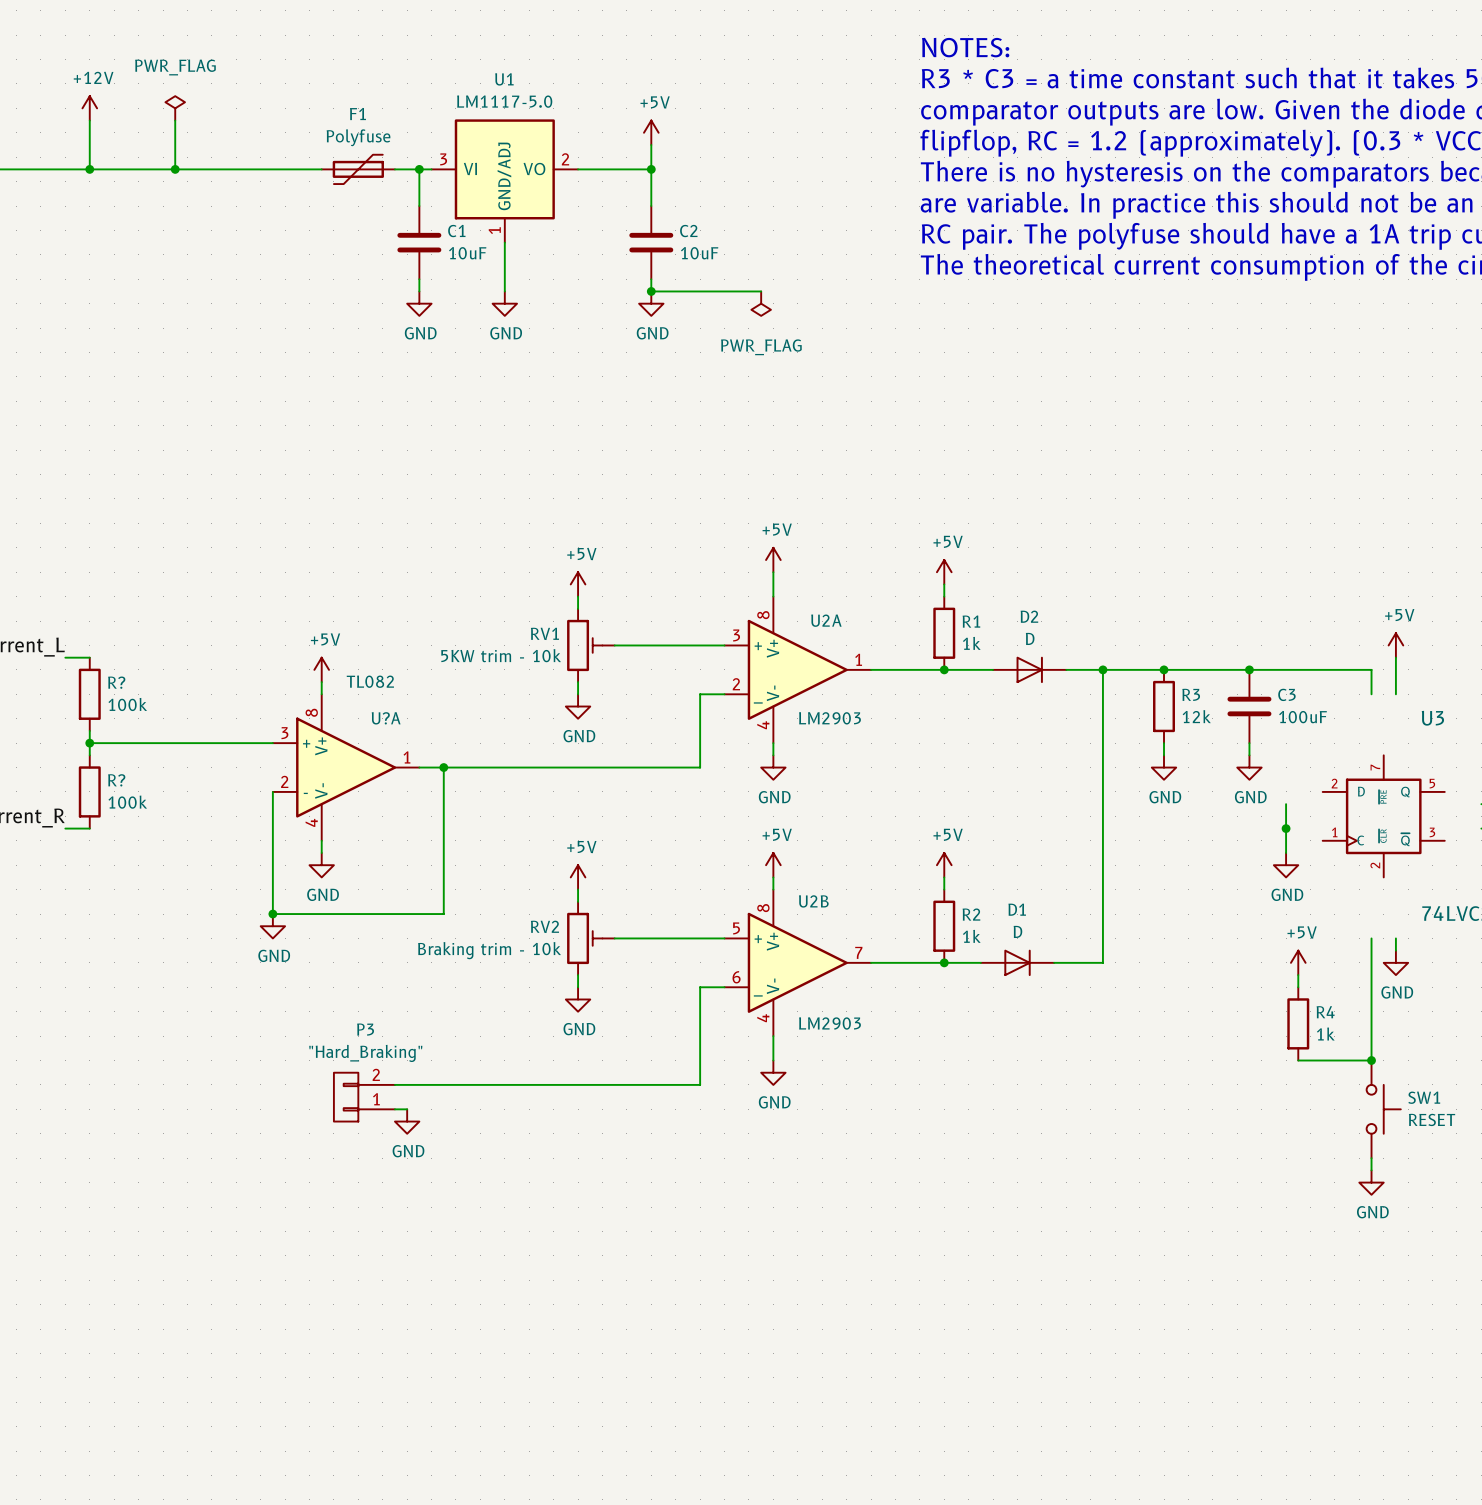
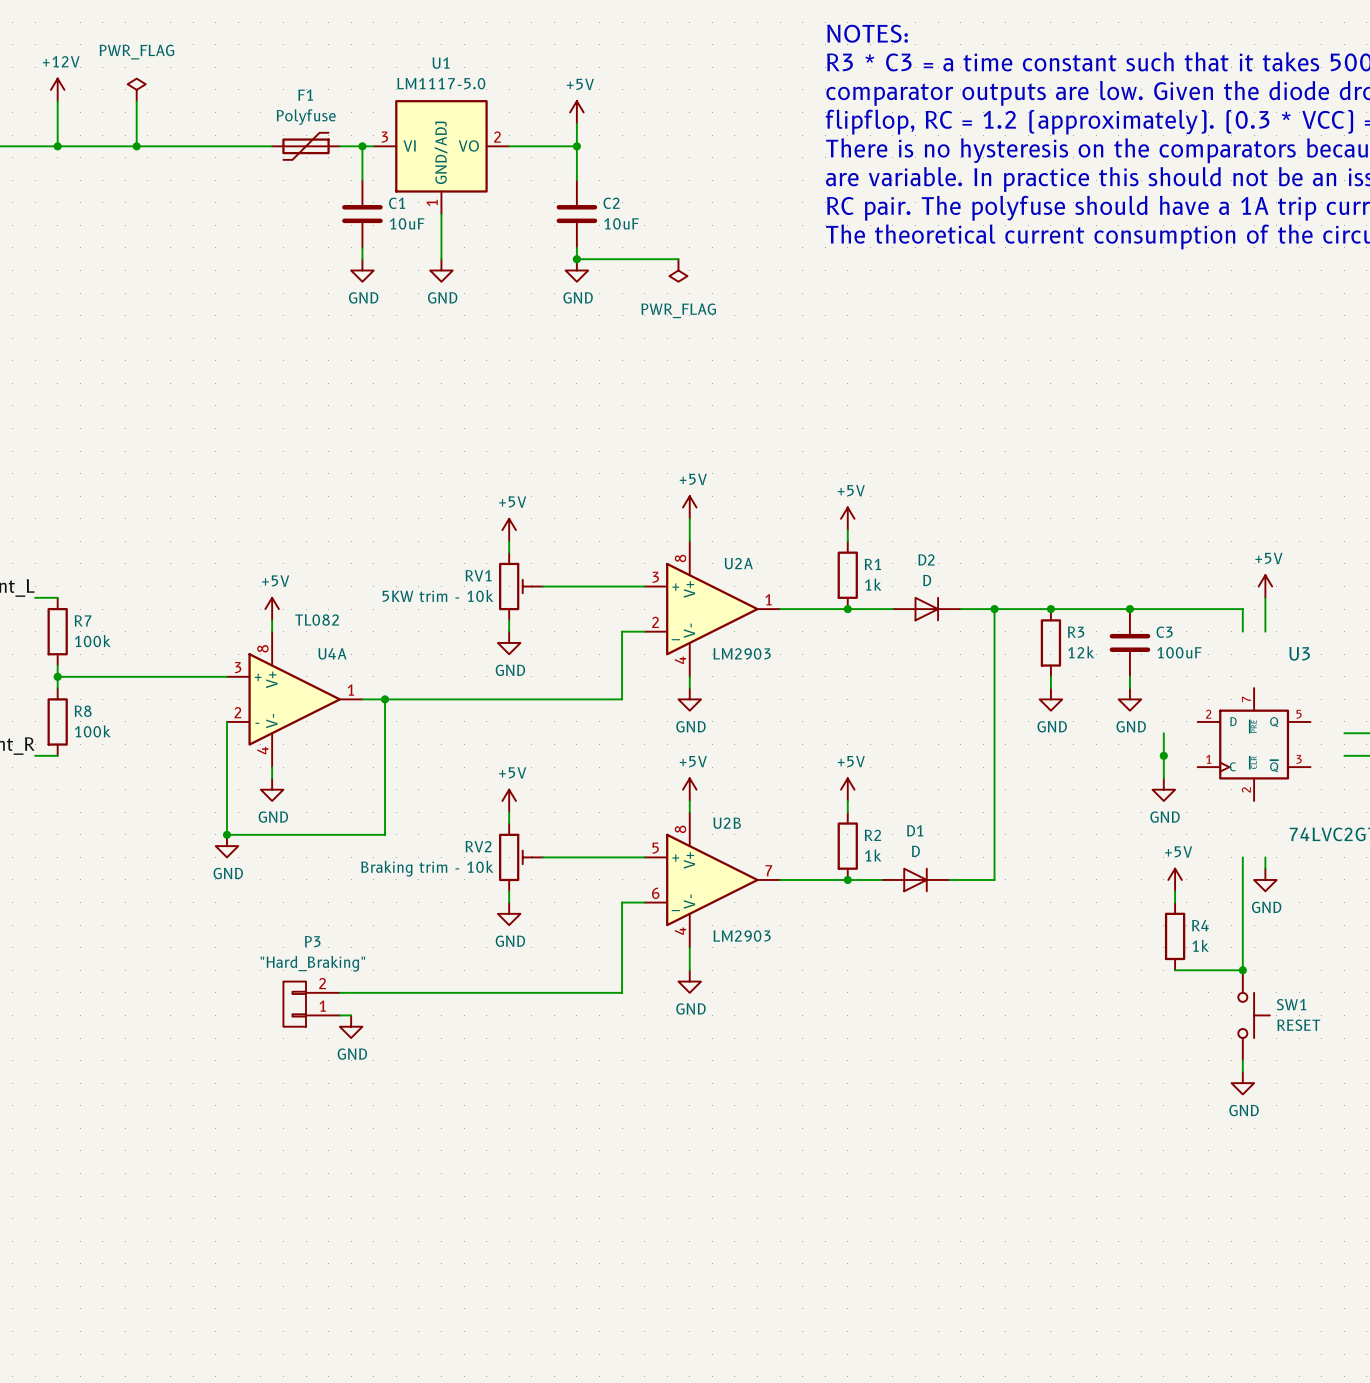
R? name: R? (116, 682) -> R7 (82, 620)
U?A name: U?A (386, 718) -> U4A (332, 653)
R? name: R? (116, 780) -> R8 (83, 711)

